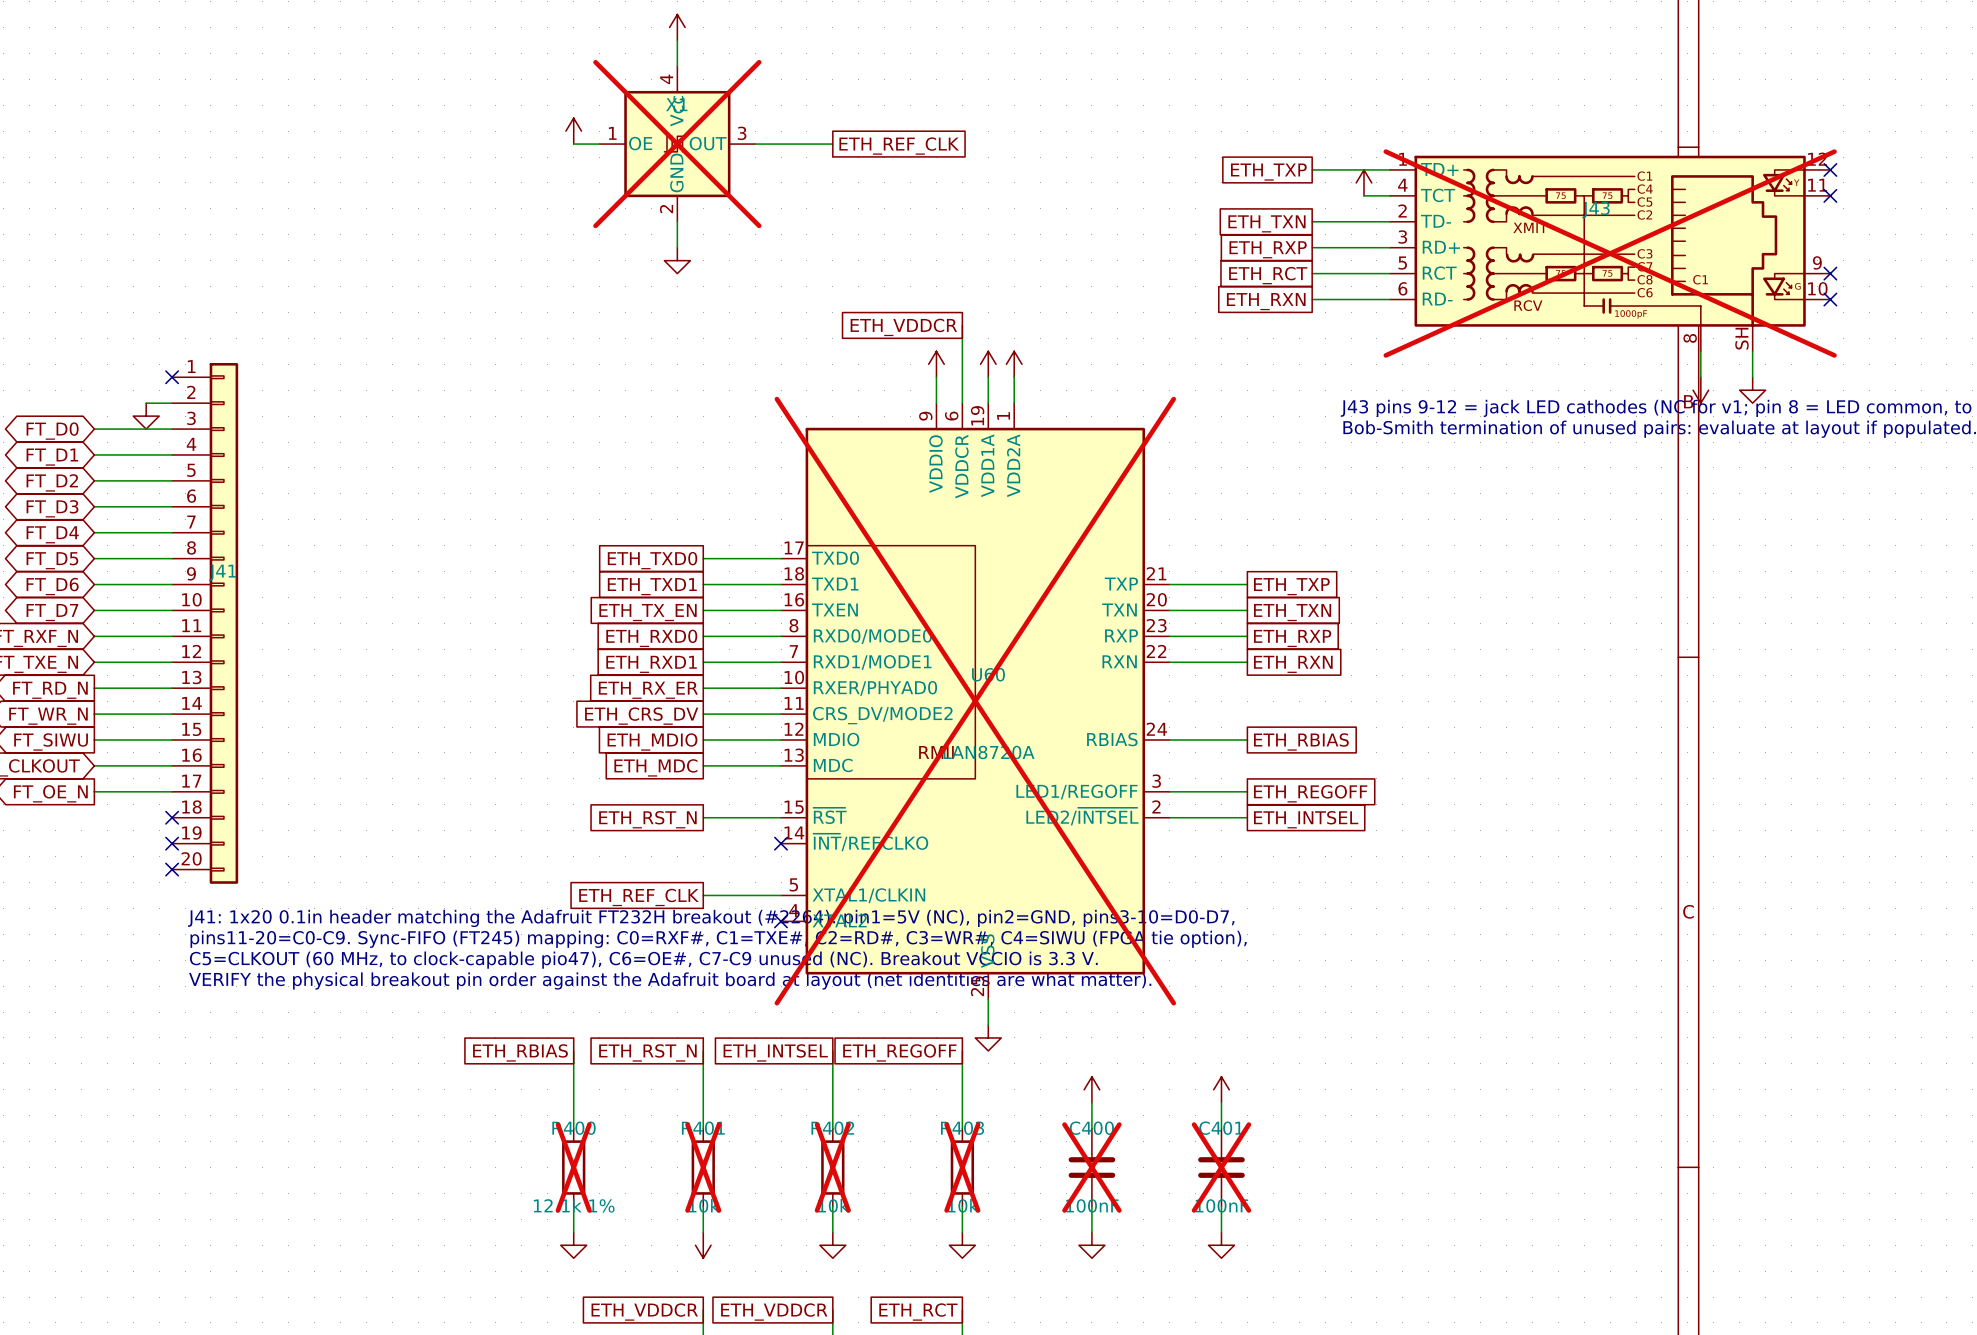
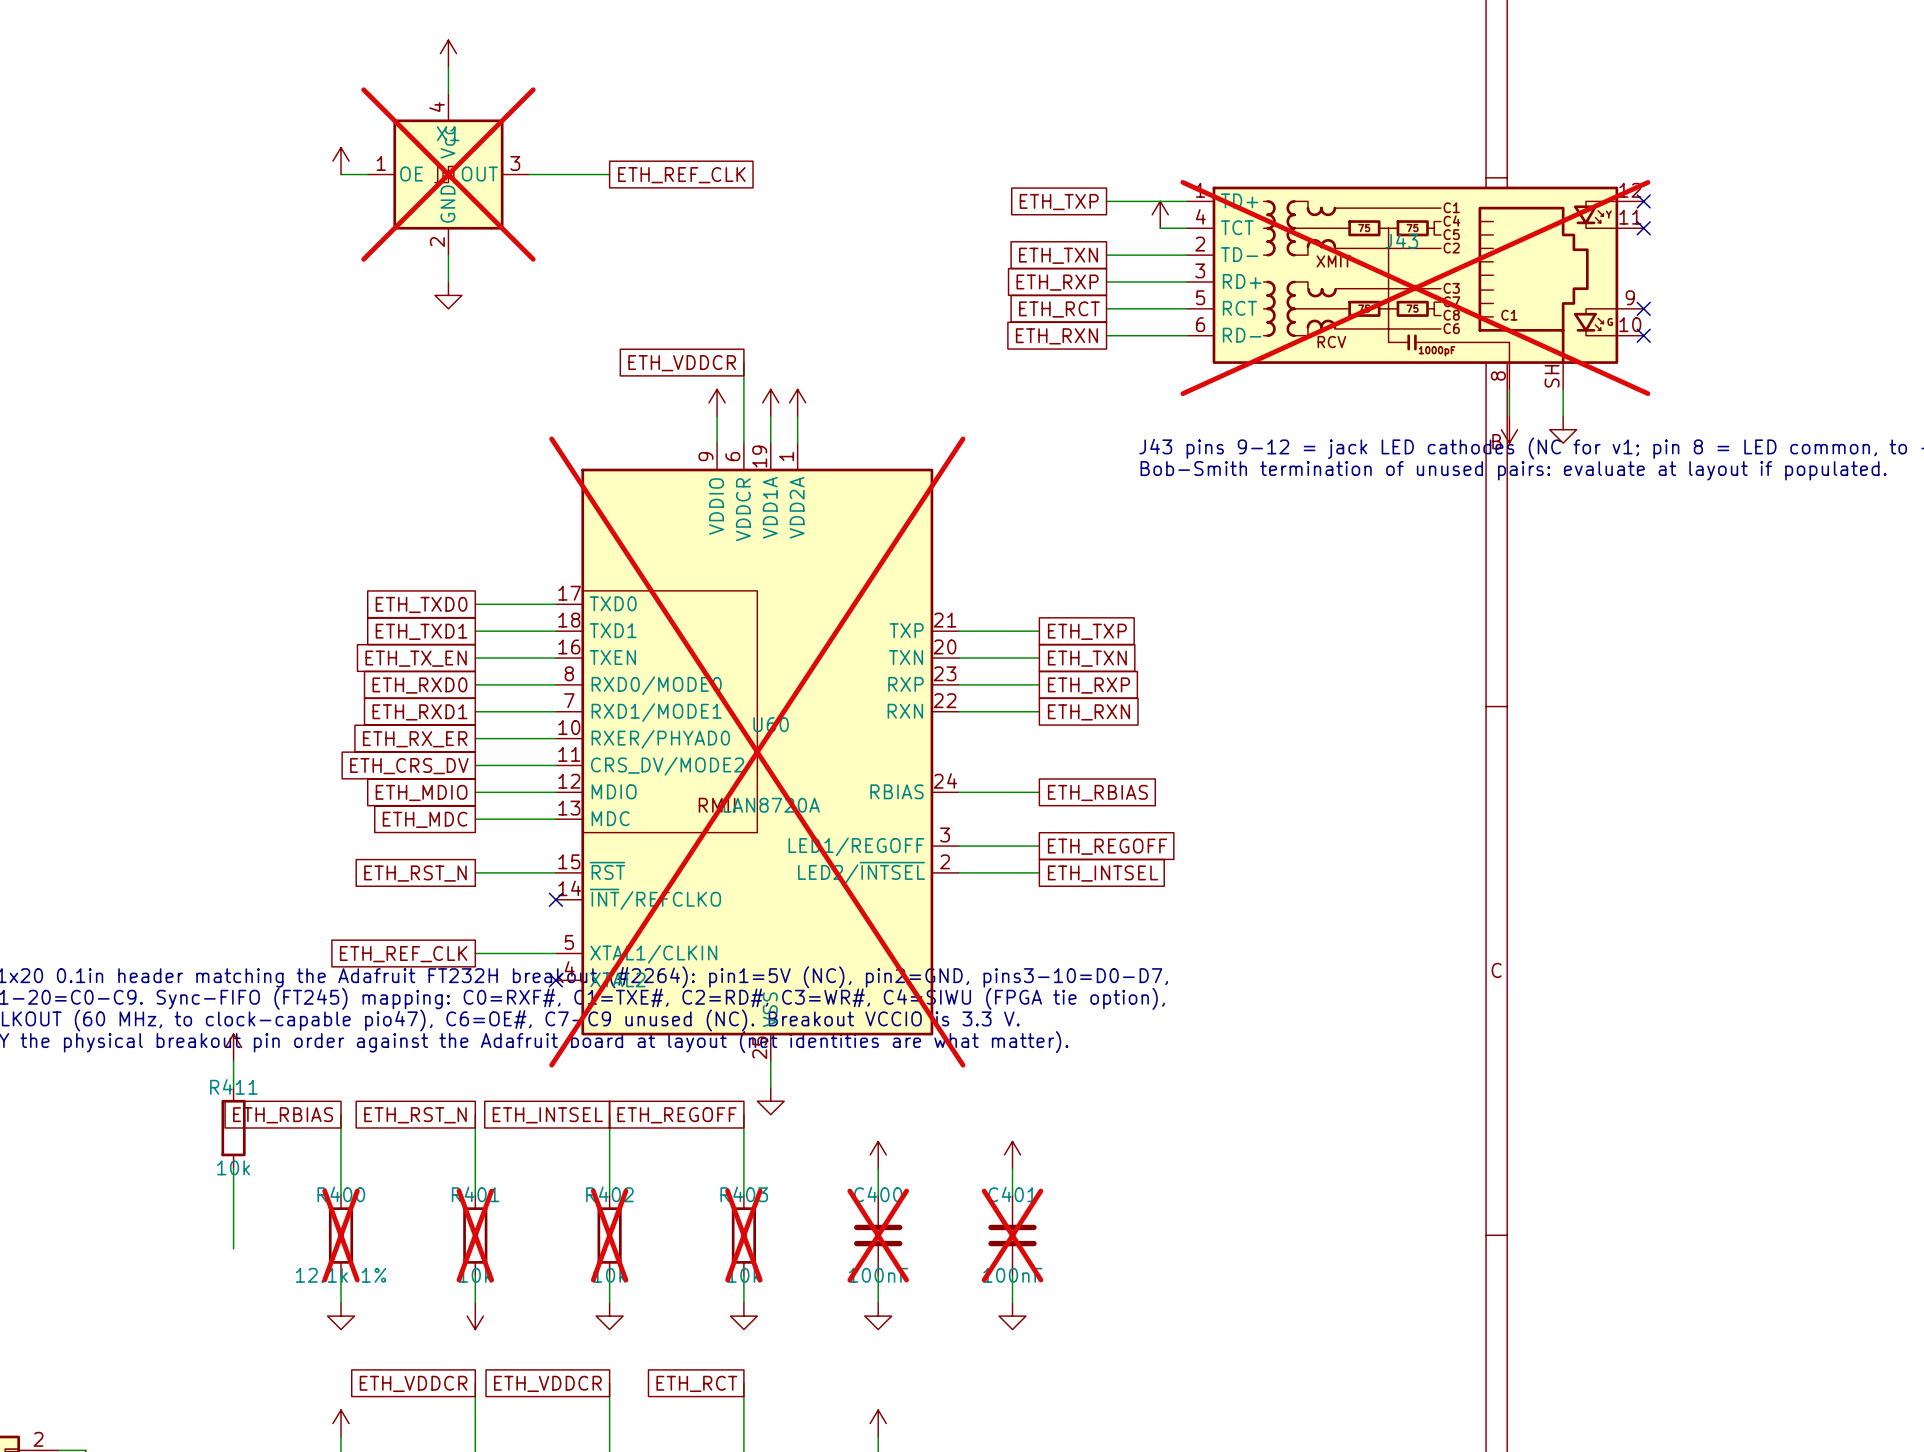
power symbol: none -> (233, 1047)
wire: none -> (233, 1060) (233, 1087)
R411: none -> 10k (233, 1128)
wire: none -> (233, 1168) (233, 1248)

